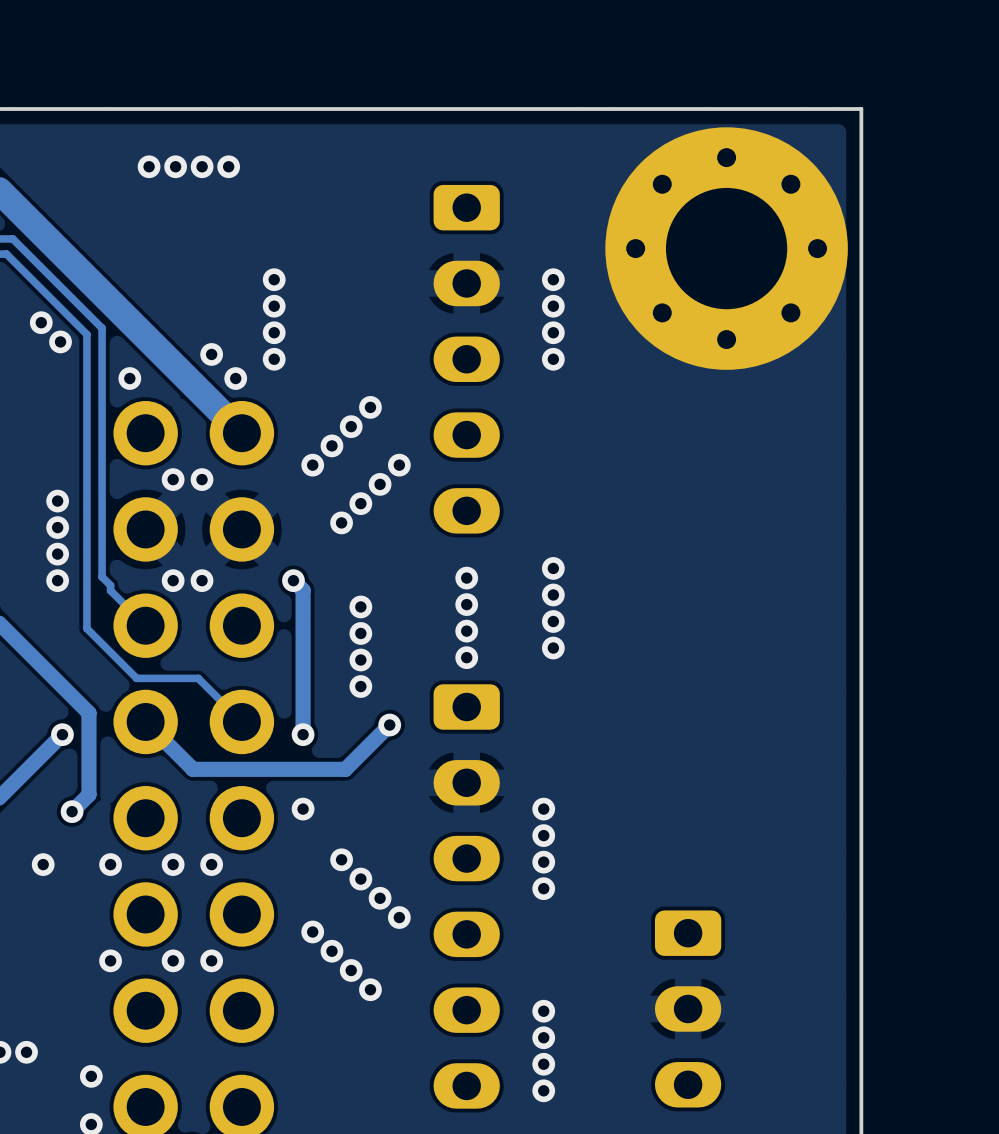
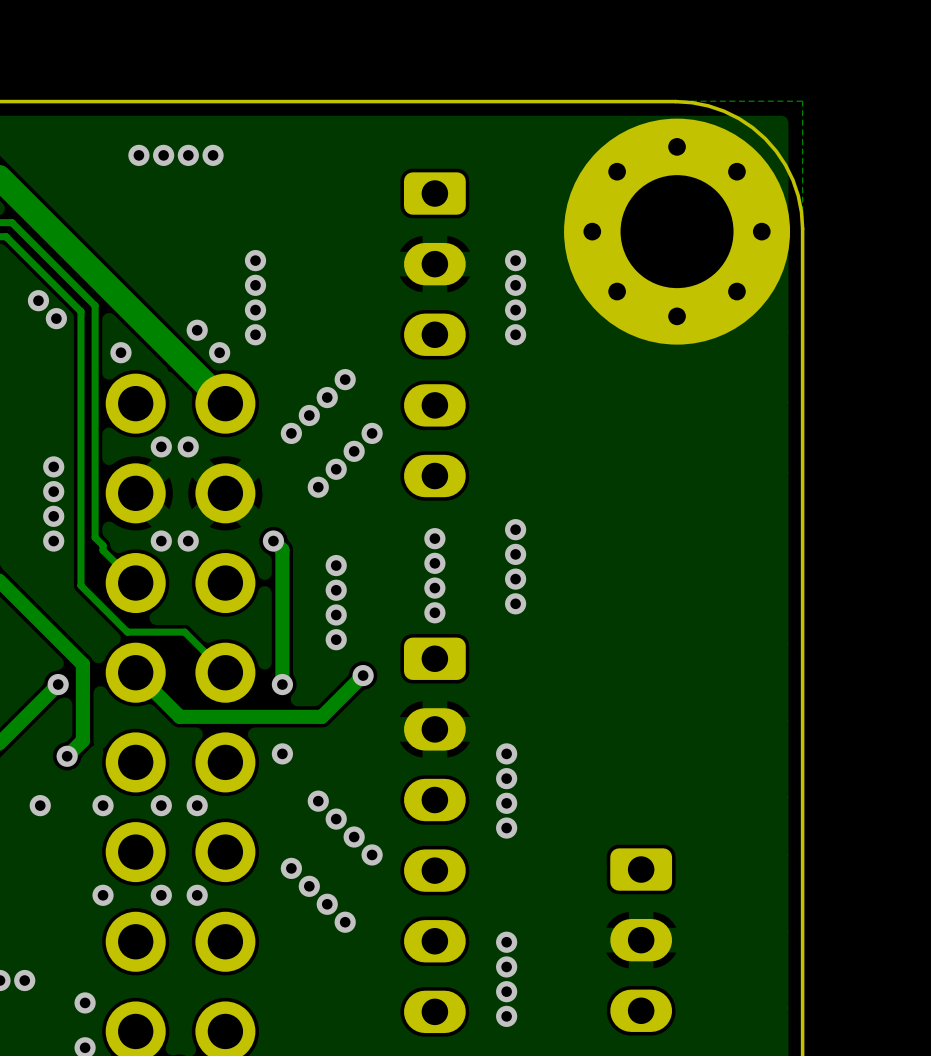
board edge: (724, 109) (861, 109) (861, 245) -> (675, 101) (708, 105) (724, 111) (752, 127) (765, 138) (785, 165) (792, 180) (798, 195) (802, 228)

